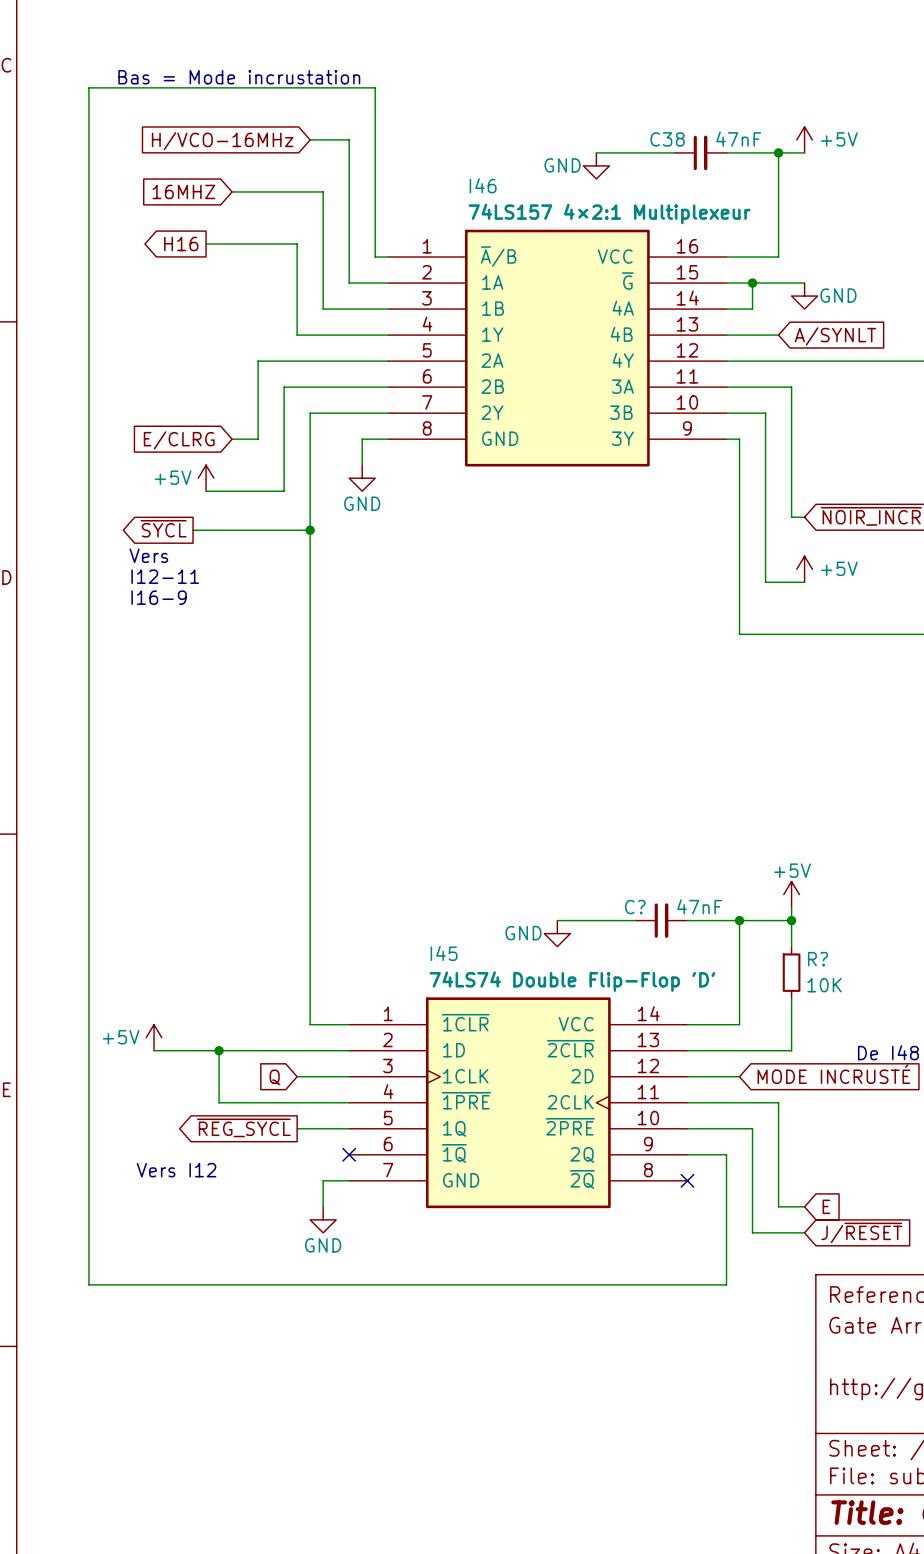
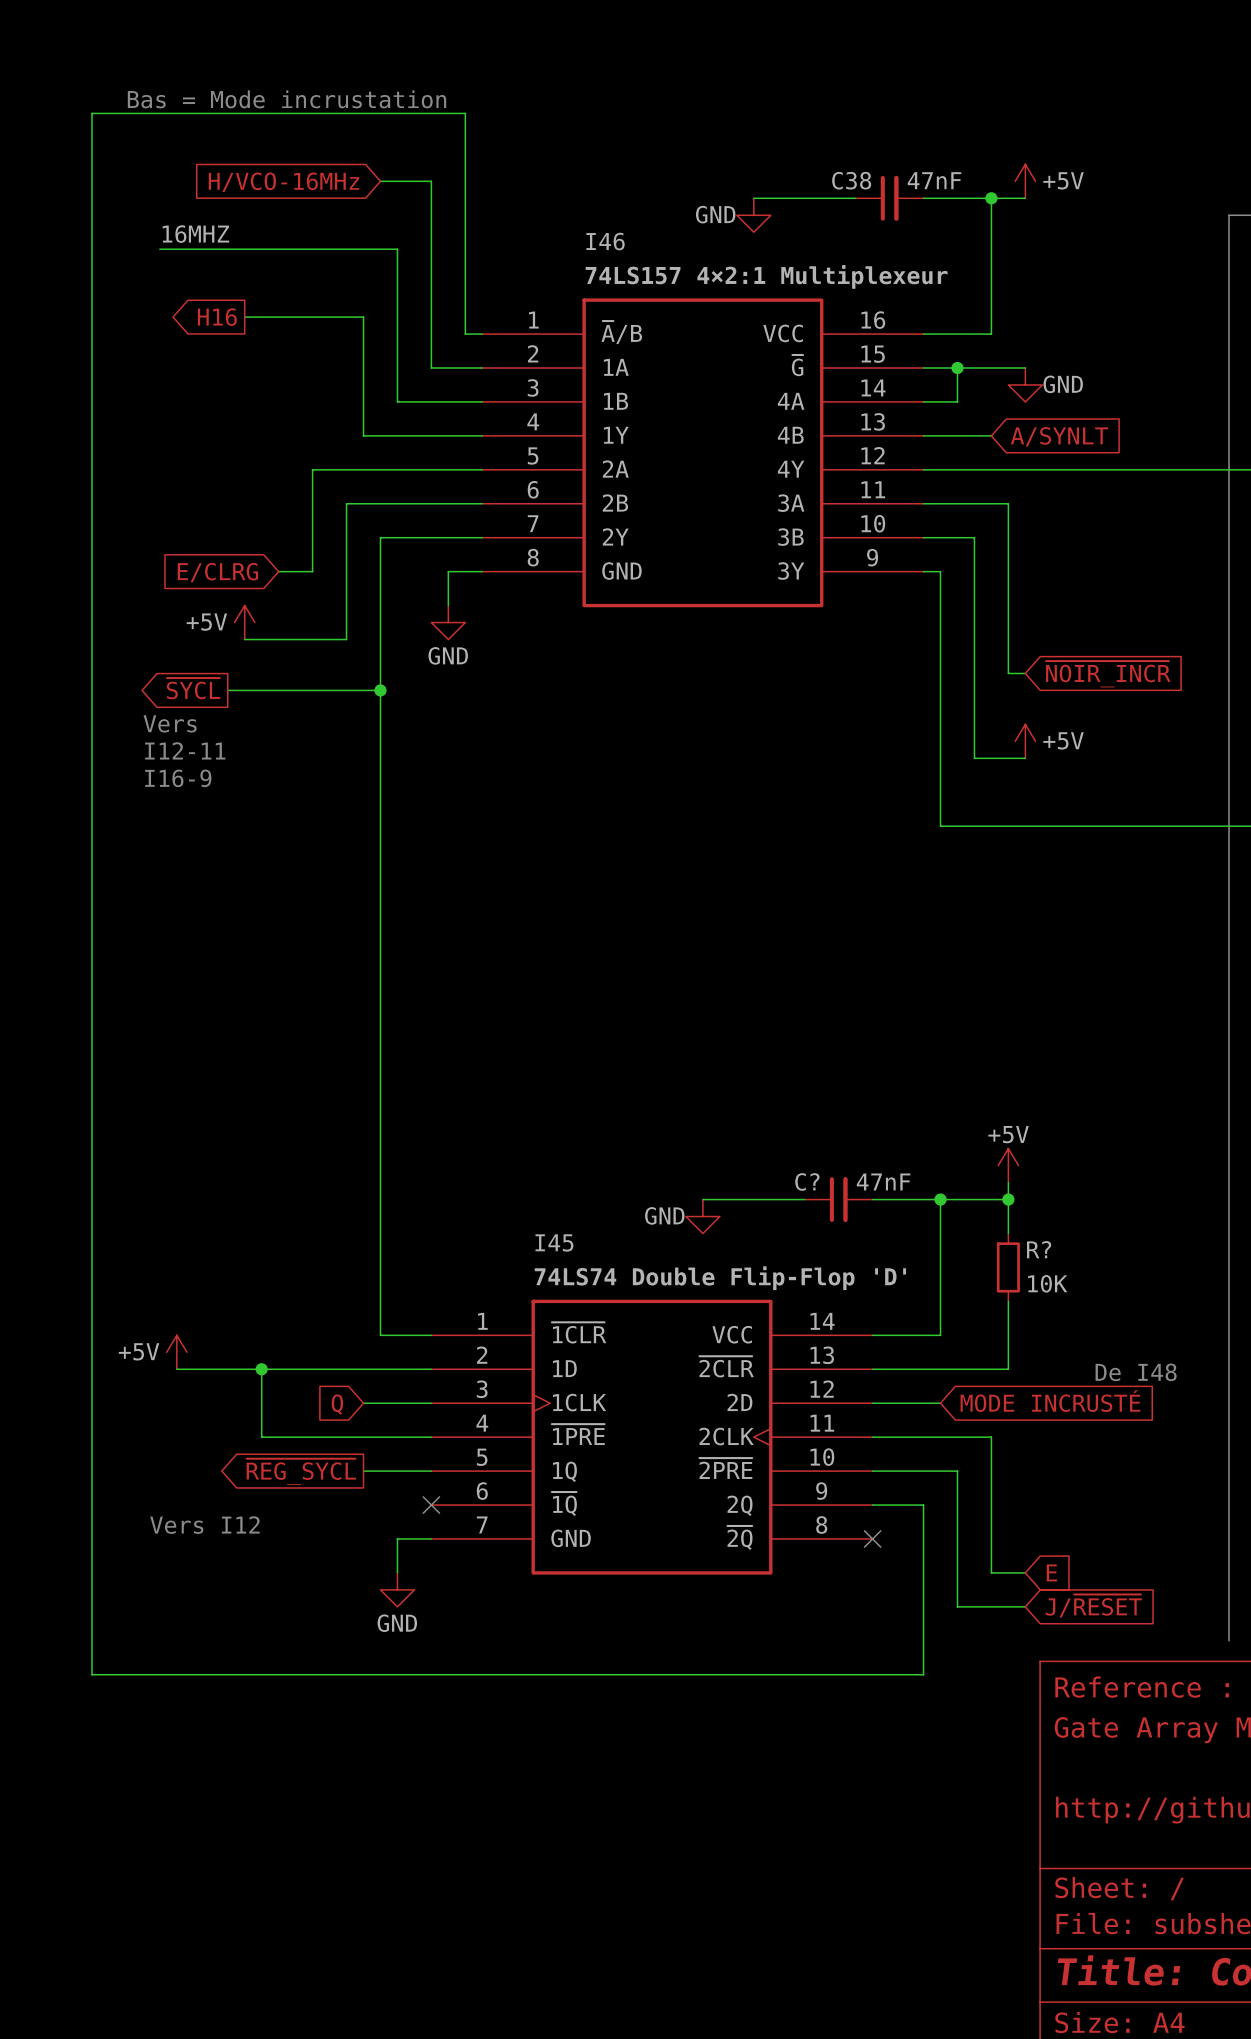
label: none -> 16MHZ (195, 234)
wire: none -> (159, 249) (278, 249)
global label: 16MHZ (183, 191) -> none

